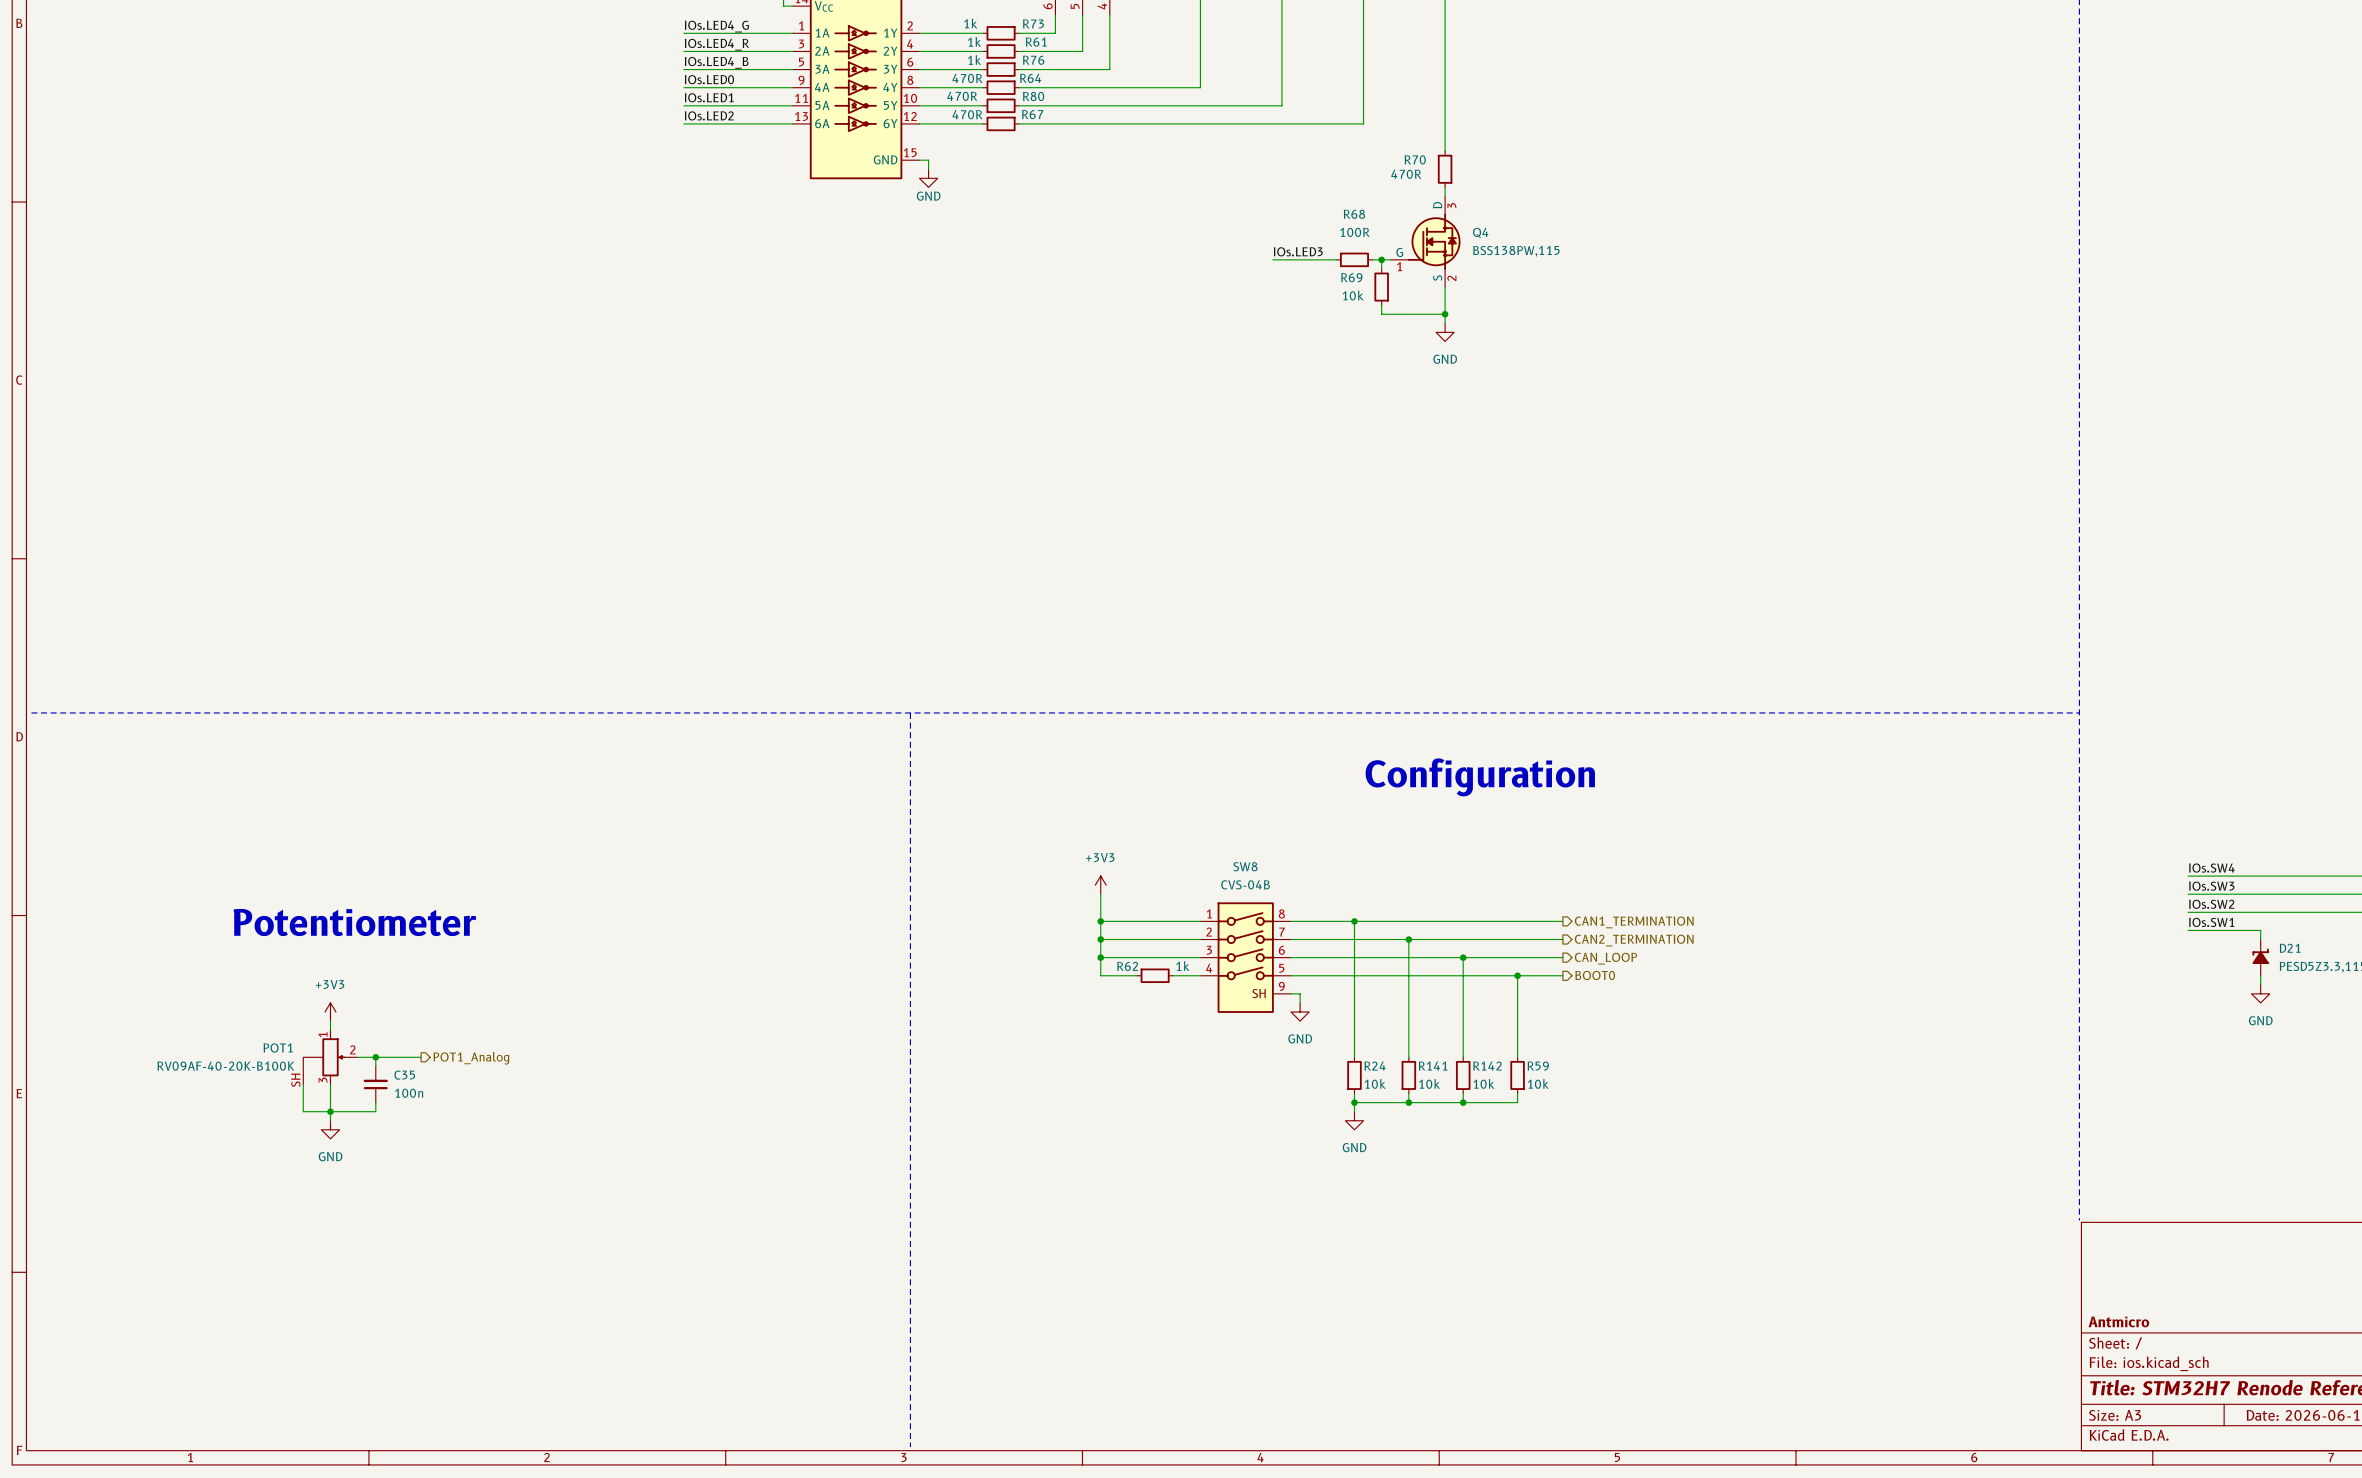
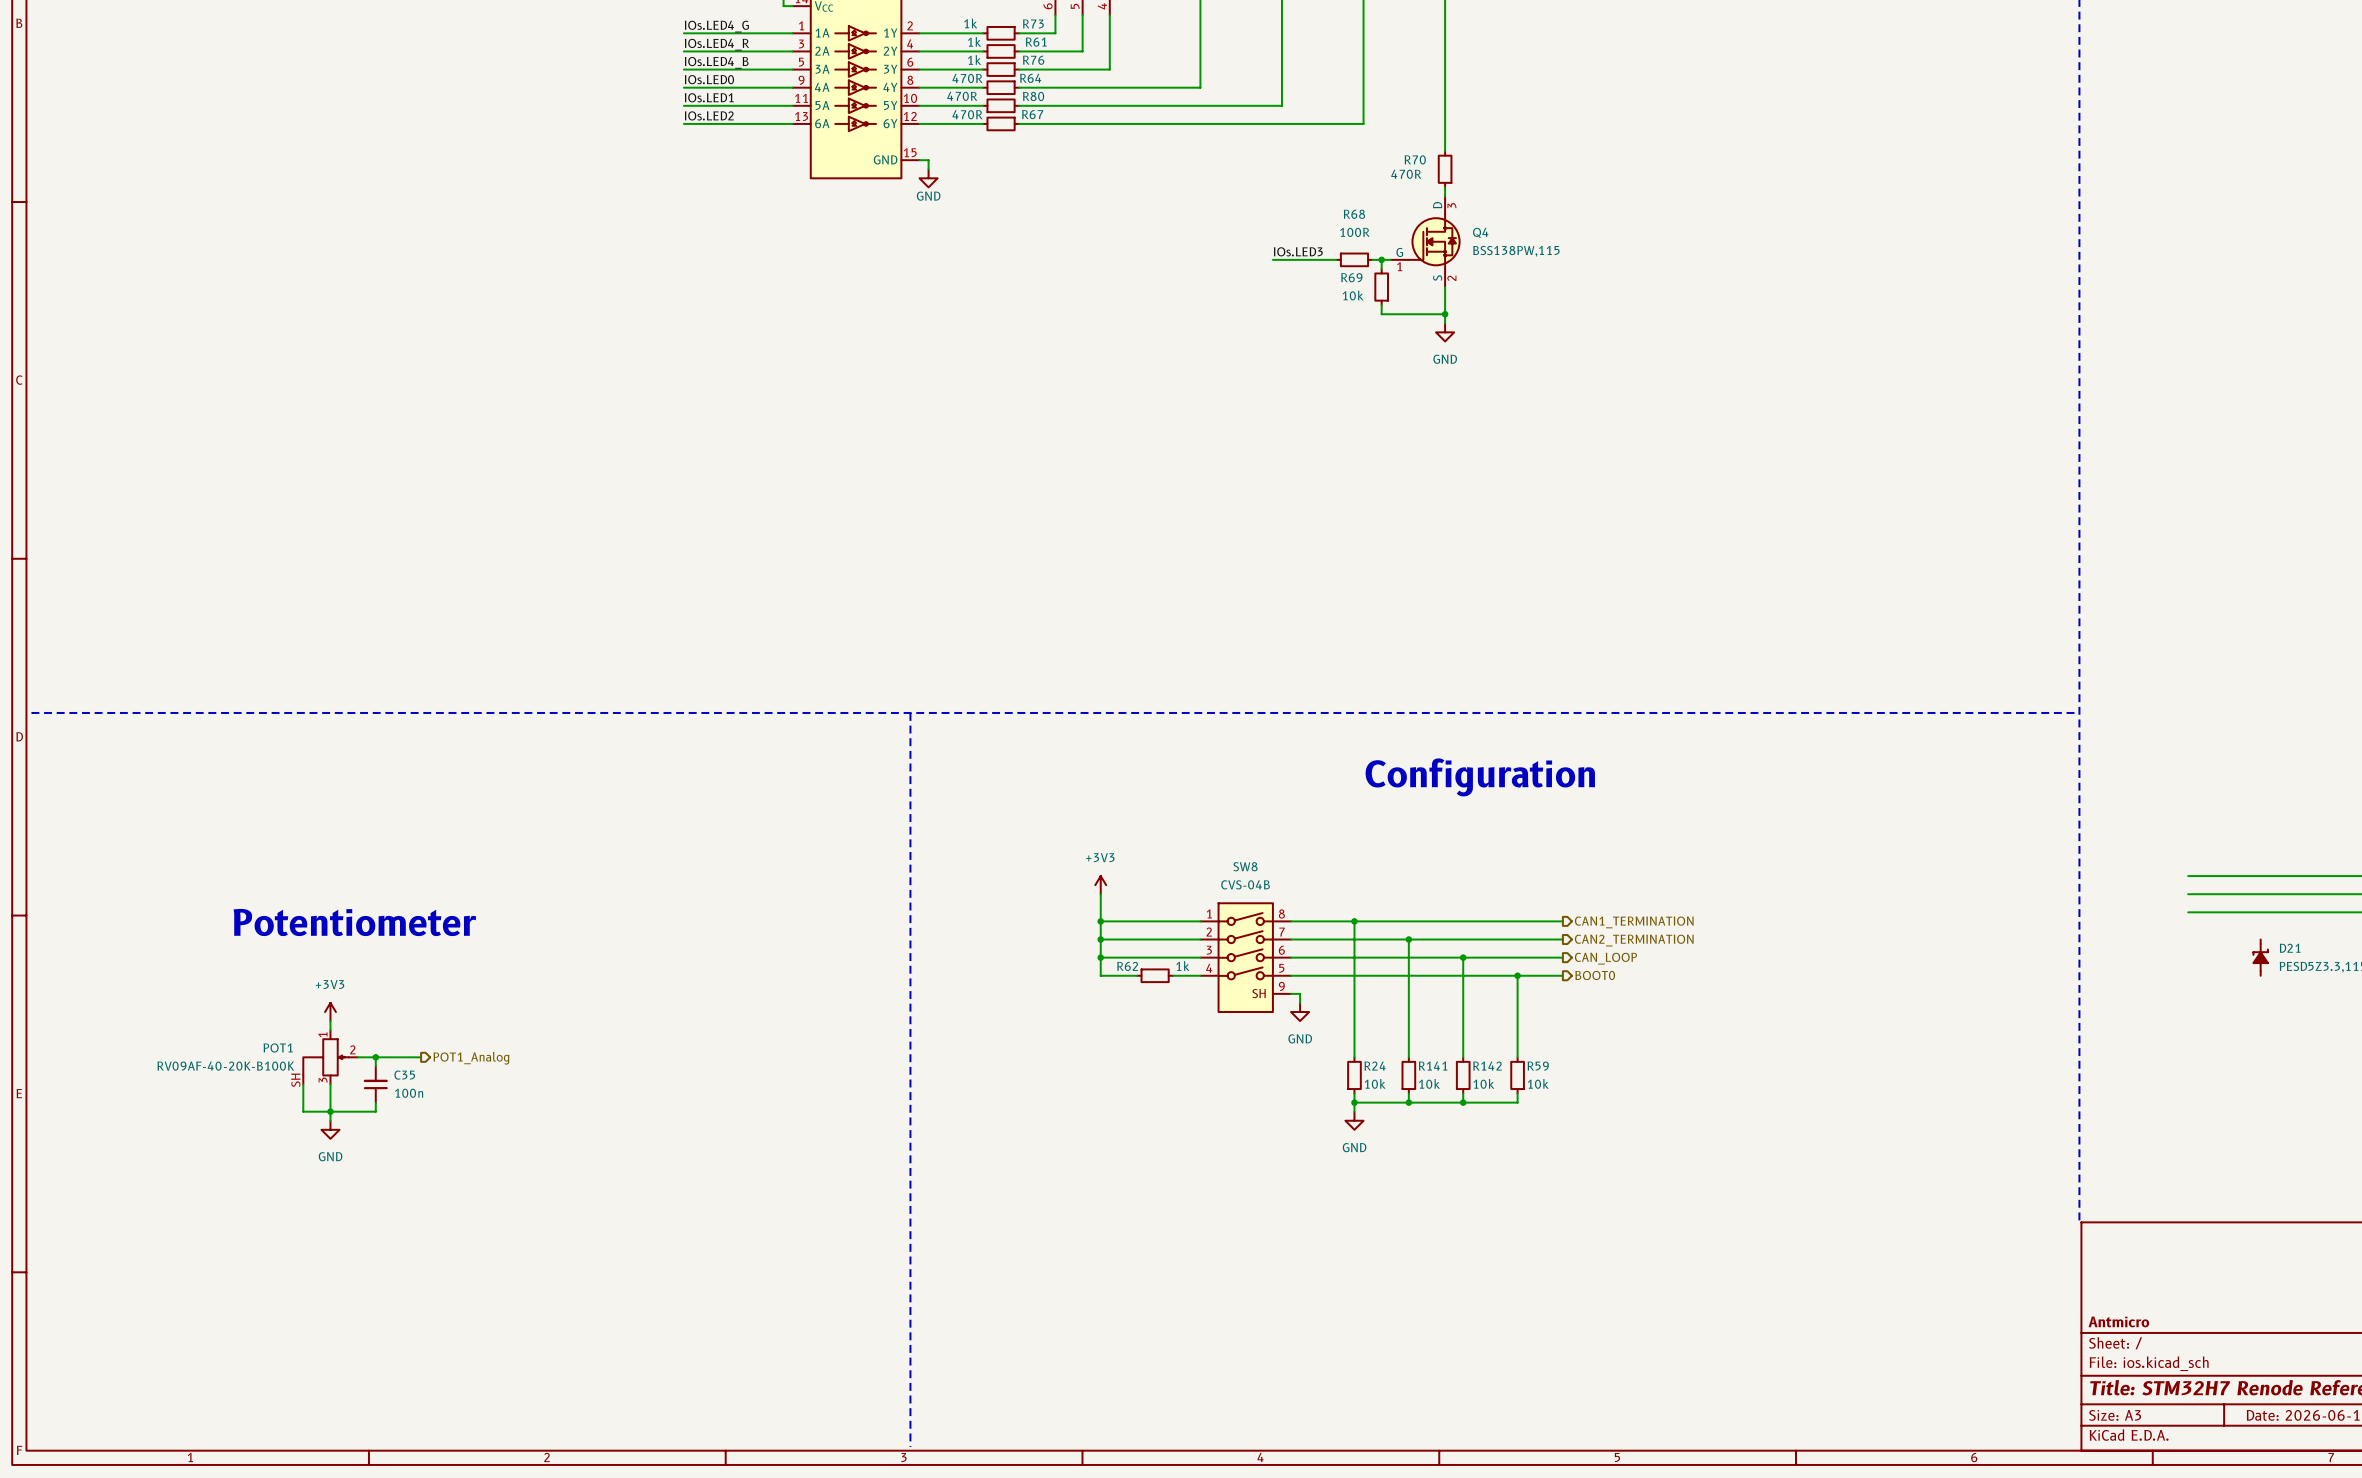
label: IOs.SW4 (2211, 868) -> none
label: IOs.SW3 (2211, 886) -> none
label: IOs.SW2 (2211, 904) -> none
label: IOs.SW1 (2211, 922) -> none
wire: (2188, 930) (2260, 930) (2260, 939) -> none
wire: (2260, 975) (2260, 984) -> none
power symbol: GND (2260, 993) -> none

